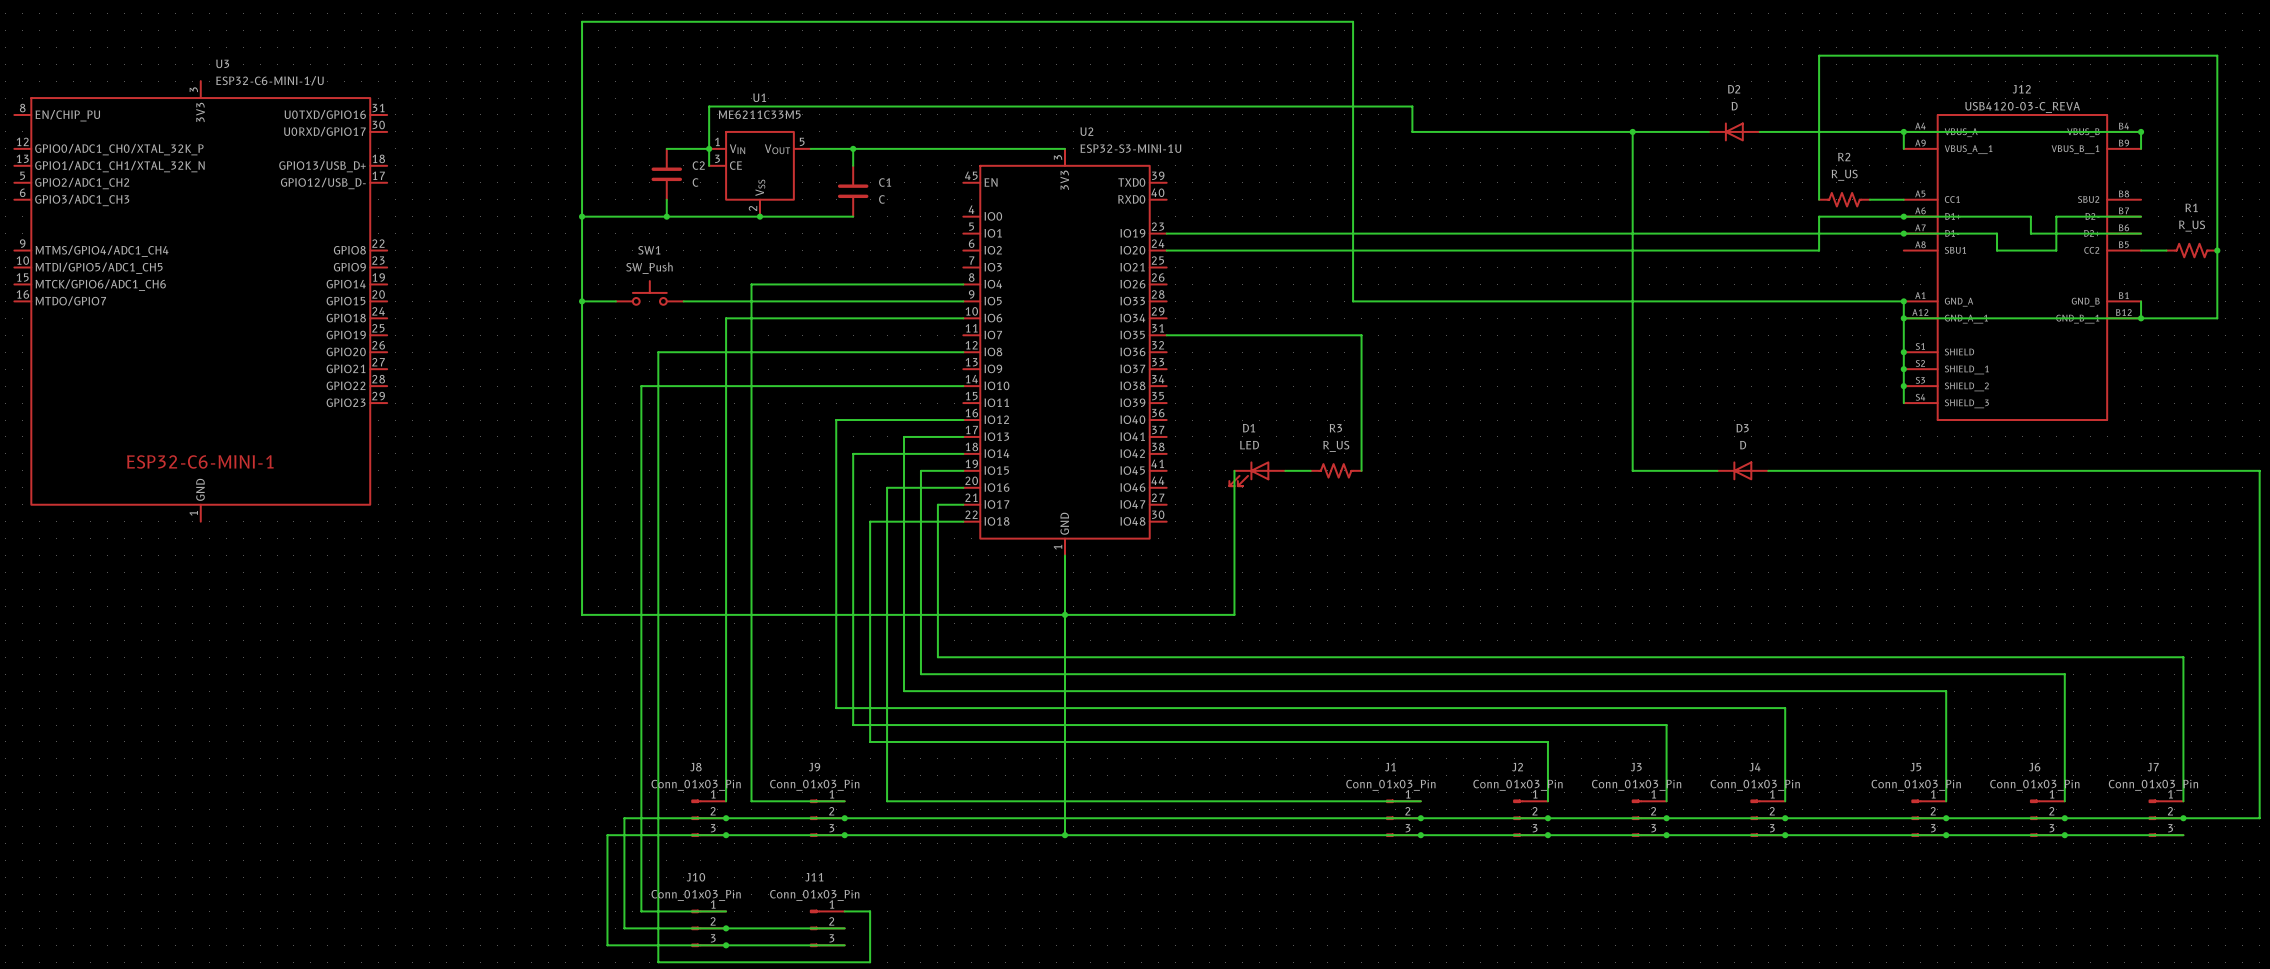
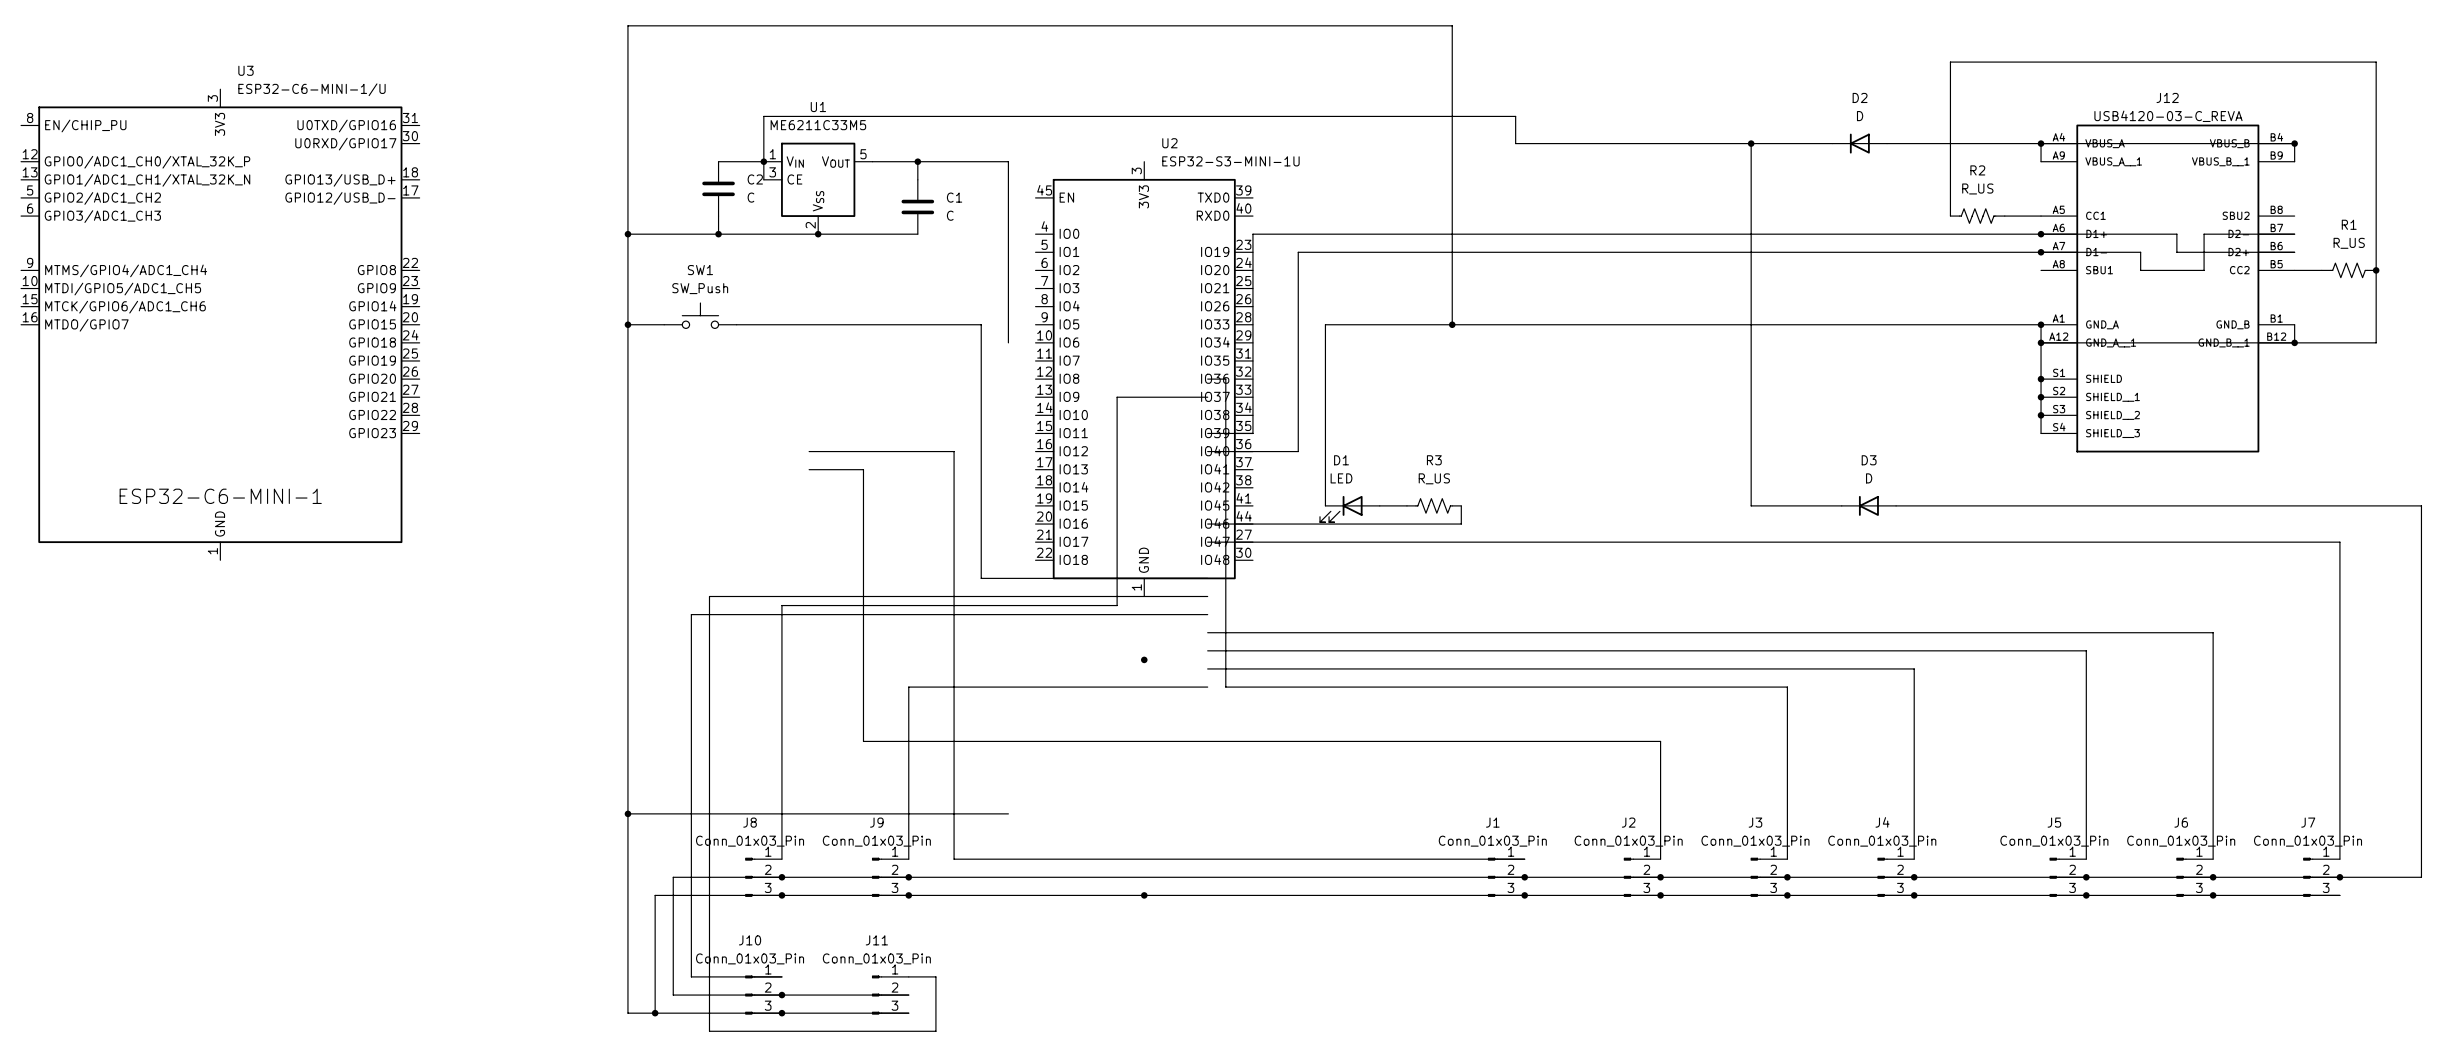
wire: (937, 148) (1065, 148) -> (1008, 161) (1008, 342)
wire: (1819, 216) (1819, 250) (1166, 250) -> (1950, 234) (1252, 234) (1252, 433) (1207, 433)
wire: (1166, 233) (1209, 233) -> (1207, 451) (1298, 451) (1298, 252)
wire: (963, 284) (751, 284) (751, 801) (844, 801) -> (1207, 687) (908, 687) (908, 859)
wire: (912, 301) (963, 301) -> (981, 324) (981, 578) (1207, 578)
wire: none -> (1452, 324) (1325, 324) (1325, 505)
junction: none -> (1452, 324)
wire: (963, 318) (726, 318) (726, 564) -> (1207, 397) (1117, 397) (1117, 605) (781, 605)
wire: (1166, 335) (1361, 335) (1361, 470) -> (1207, 524) (1461, 524) (1461, 505)
wire: (963, 352) (658, 352) (658, 555) -> (1207, 596) (709, 596)
wire: (963, 386) (641, 386) (641, 572) -> (1207, 614) (691, 614)
wire: none -> (809, 451) (899, 451)
wire: (836, 420) (836, 708) (1785, 708) -> (1207, 668) (1914, 668) (1914, 759)
wire: (887, 420) (963, 420) -> (954, 451) (954, 524)
wire: (963, 436) (904, 436) (904, 691) -> (809, 469) (863, 469) (863, 741) (972, 741)
wire: (963, 453) (853, 453) (853, 725) (1666, 725) -> (1207, 379) (1225, 379) (1225, 687) (1787, 687) (1787, 777)
wire: (963, 470) (920, 470) (920, 674) (2064, 674) -> (1207, 632) (2213, 632) (2213, 723)
wire: (1234, 470) (1234, 614) (582, 614) -> (655, 1013) (627, 1013) (627, 659)
wire: (887, 487) (963, 487) -> none
wire: (963, 504) (937, 504) (937, 657) (2183, 657) -> (1207, 542) (2339, 542) (2339, 705)
wire: (963, 521) (870, 521) (870, 741) (1547, 741) -> none
wire: (1065, 555) (1065, 835) -> none
wire: none -> (1207, 650) (2086, 650) (2086, 741)
wire: (1547, 691) (1946, 691) -> (1660, 741) (1660, 795)
wire: none -> (627, 813) (1008, 813)
junction: none -> (627, 813)
junction: none -> (655, 1013)

